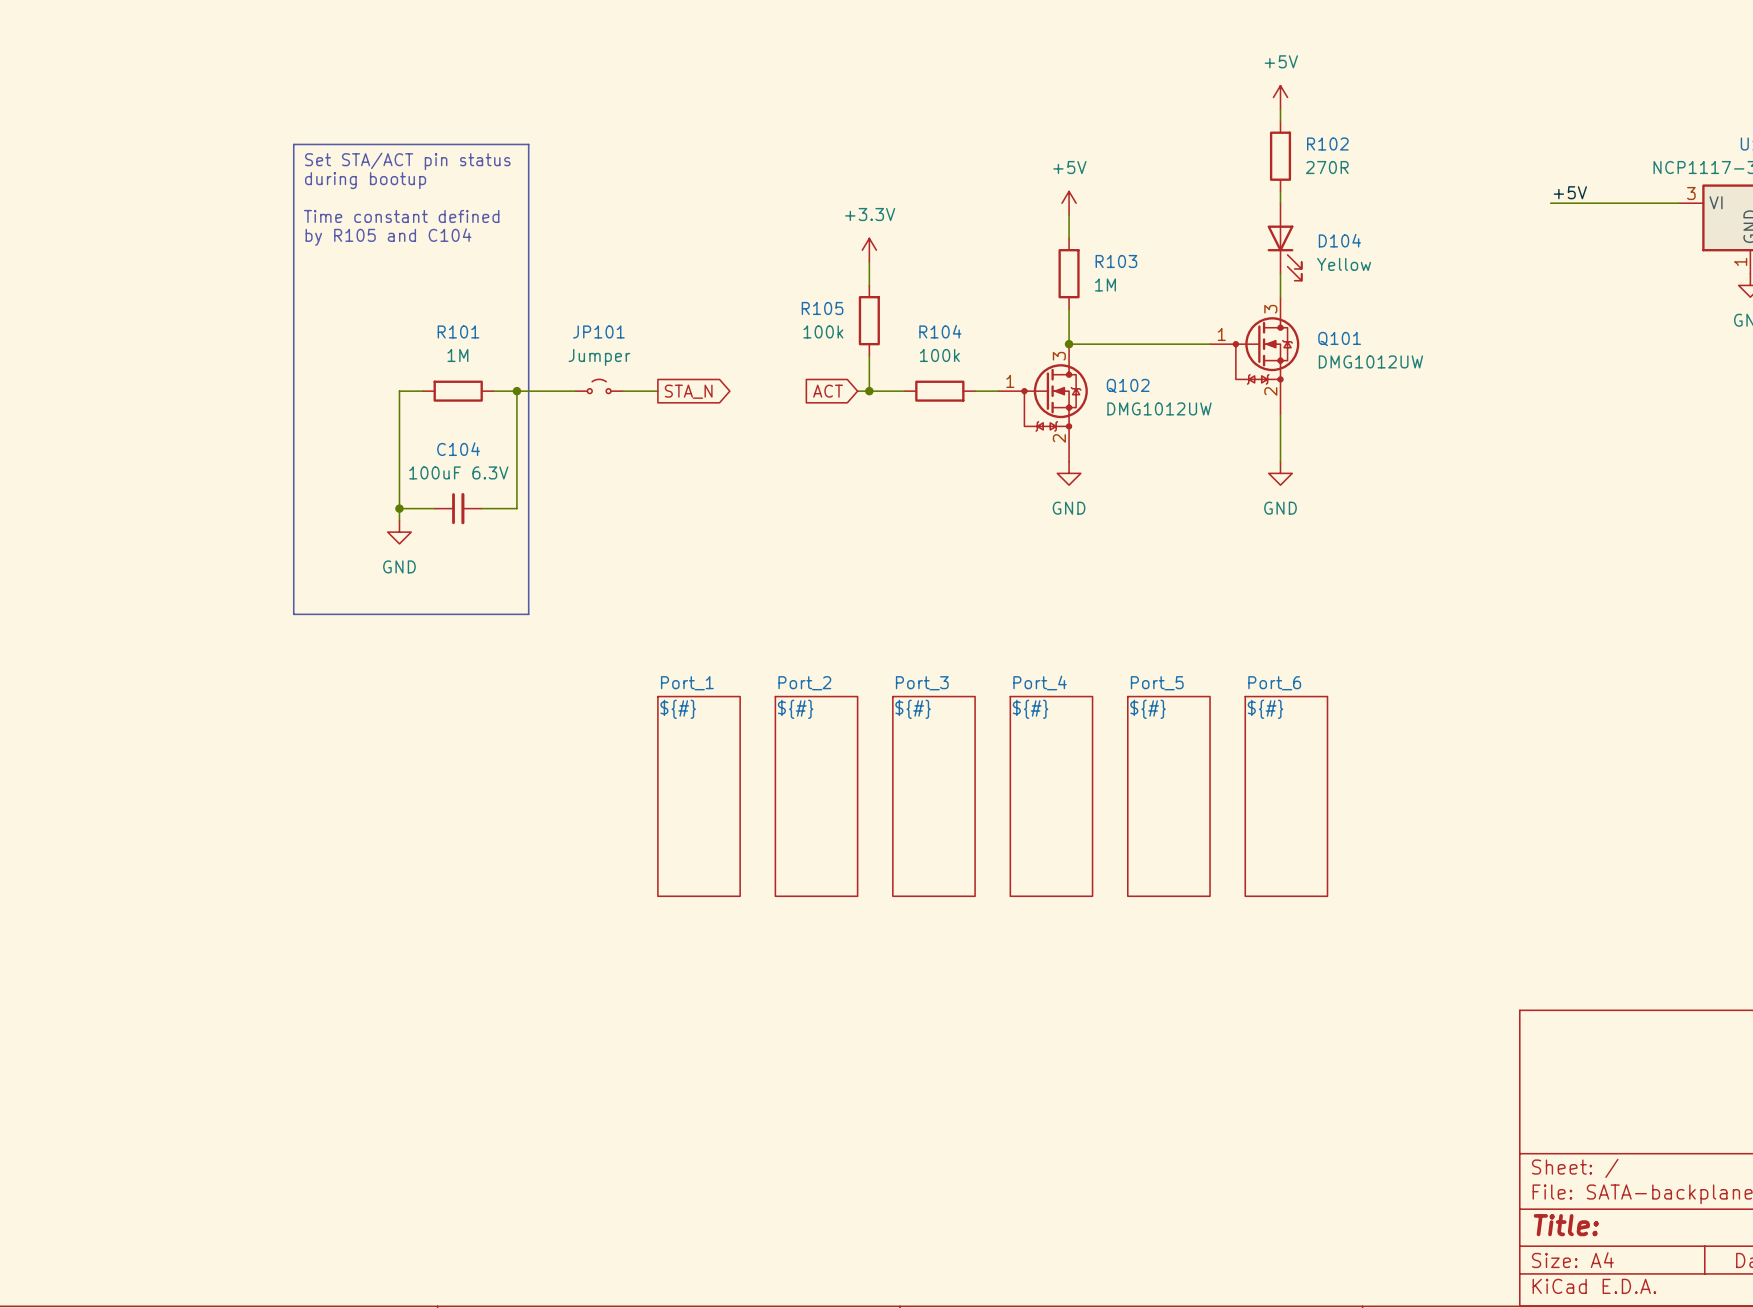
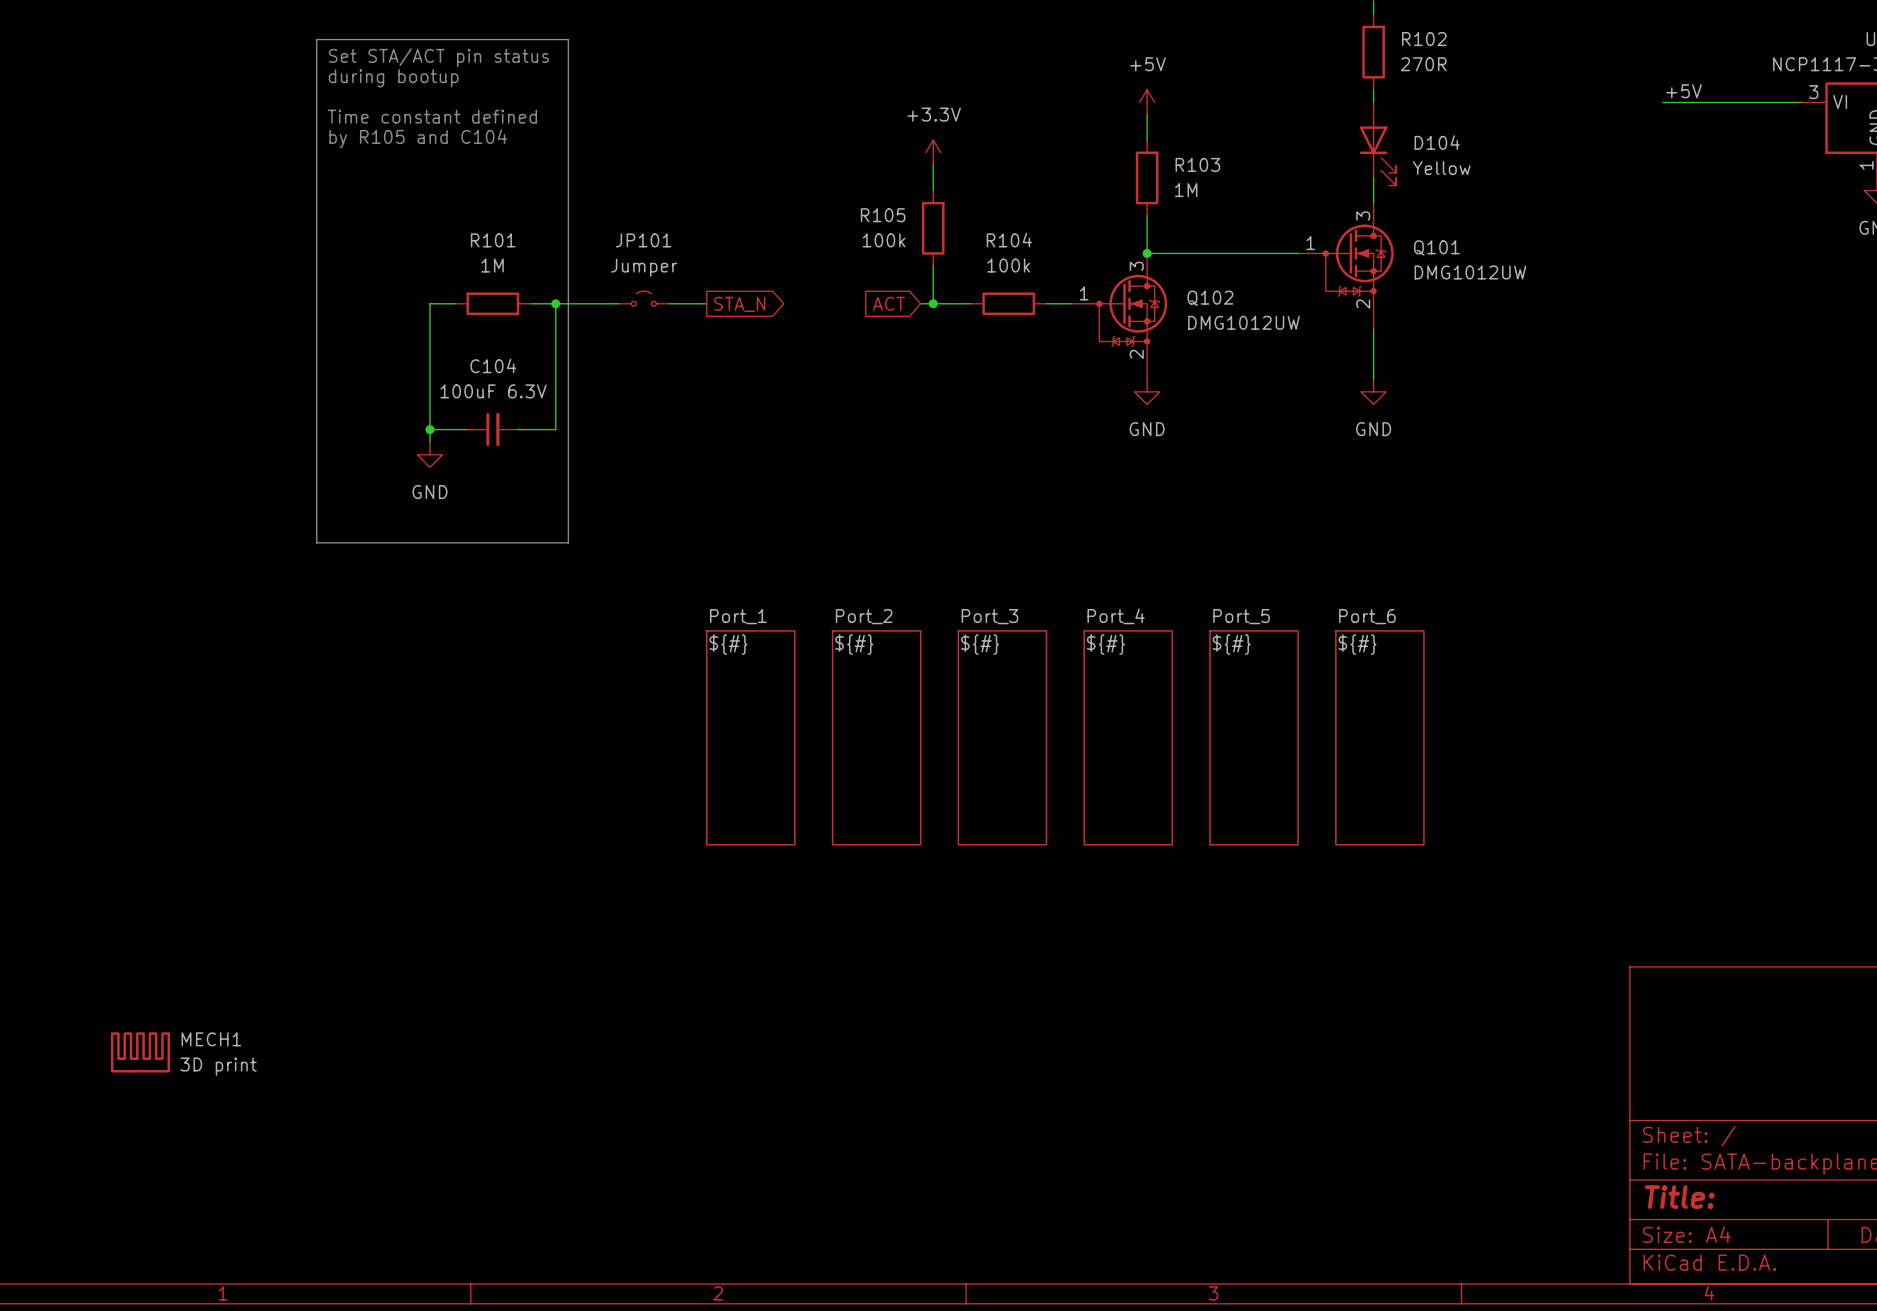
MECH1: none -> 3D print (140, 1052)

